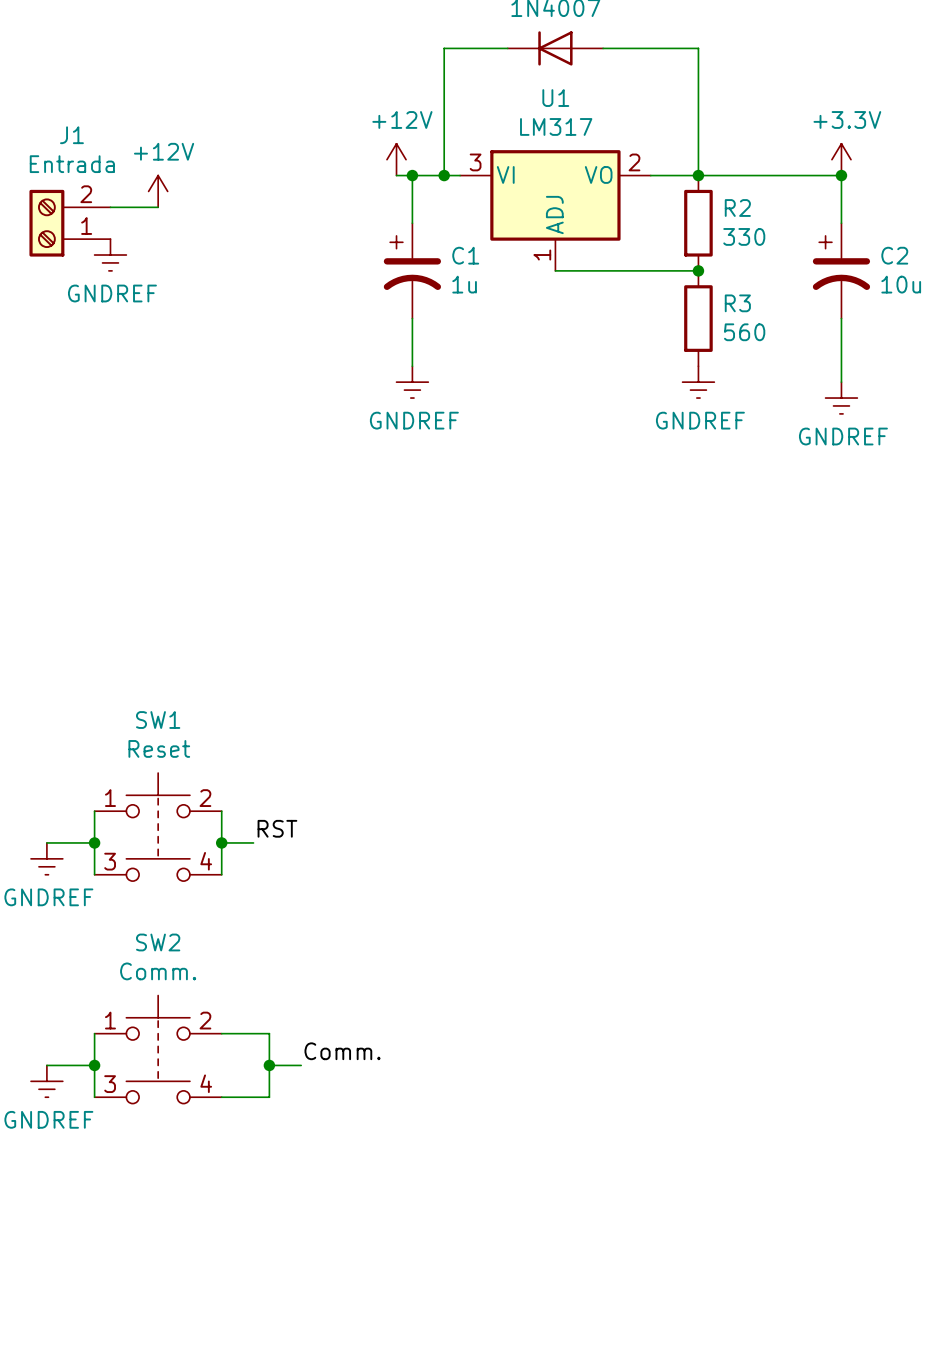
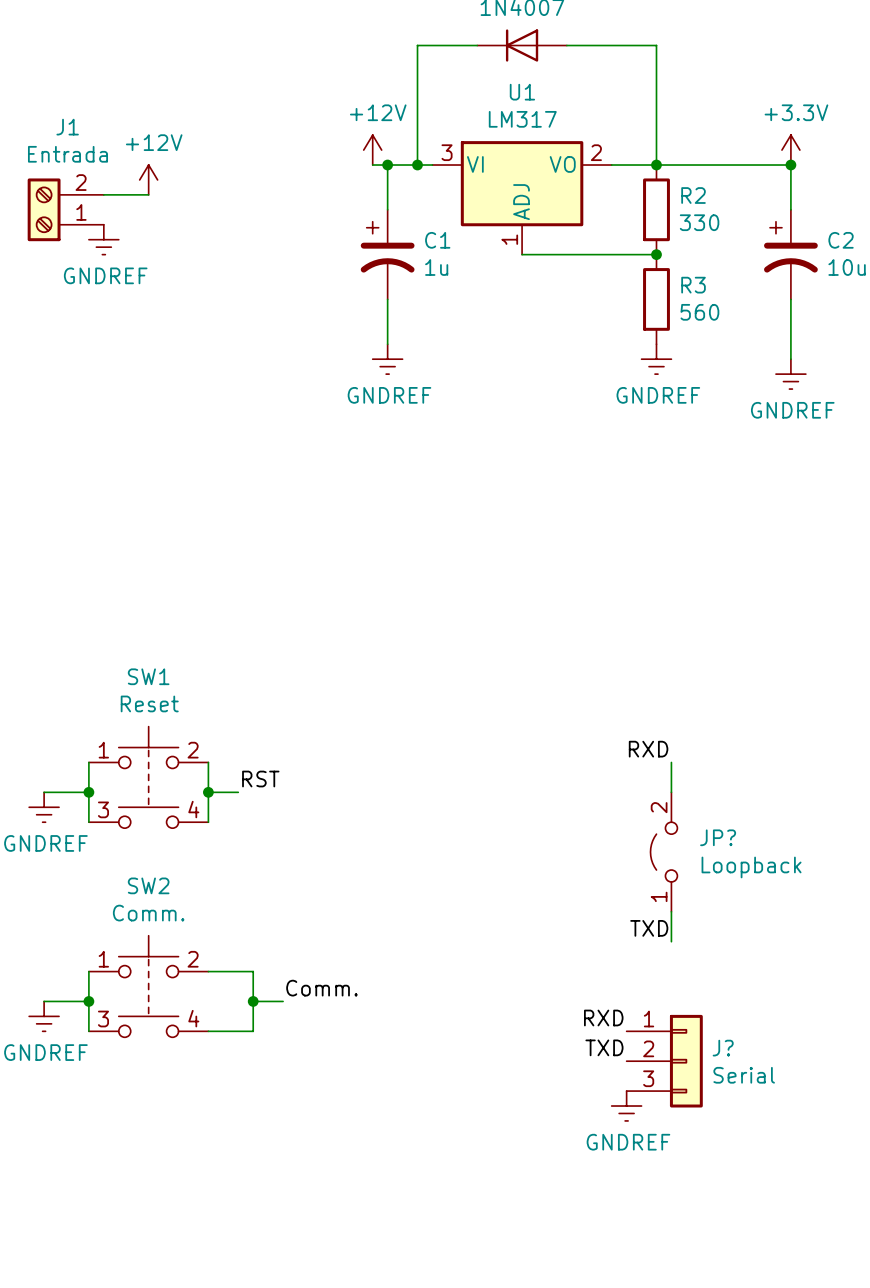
label: none -> RXD (648, 749)
wire: none -> (671, 762) (671, 792)
JP?: none -> Loopback (663, 852)
wire: none -> (671, 911) (671, 941)
label: none -> TXD (649, 928)
label: none -> RXD (603, 1018)
label: none -> TXD (604, 1047)
J?: none -> Serial (664, 1061)
power symbol: none -> GNDREF (626, 1106)

